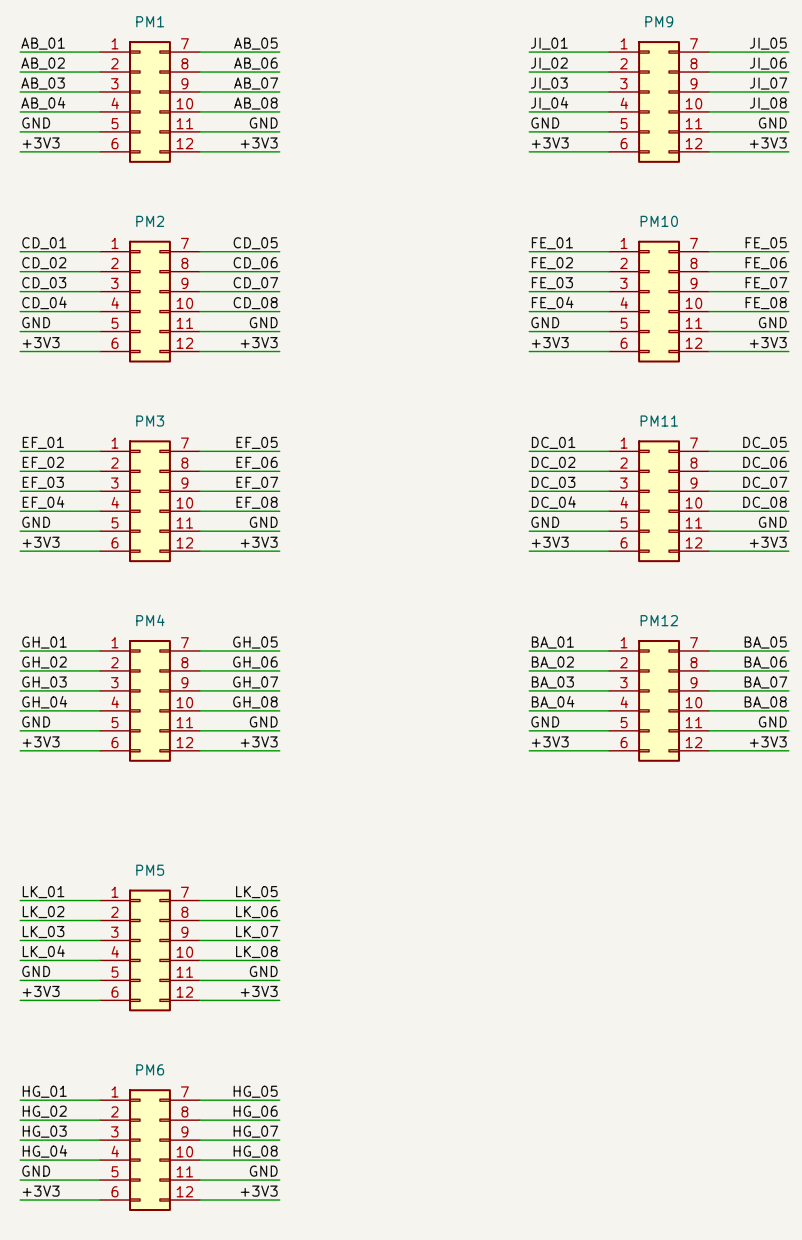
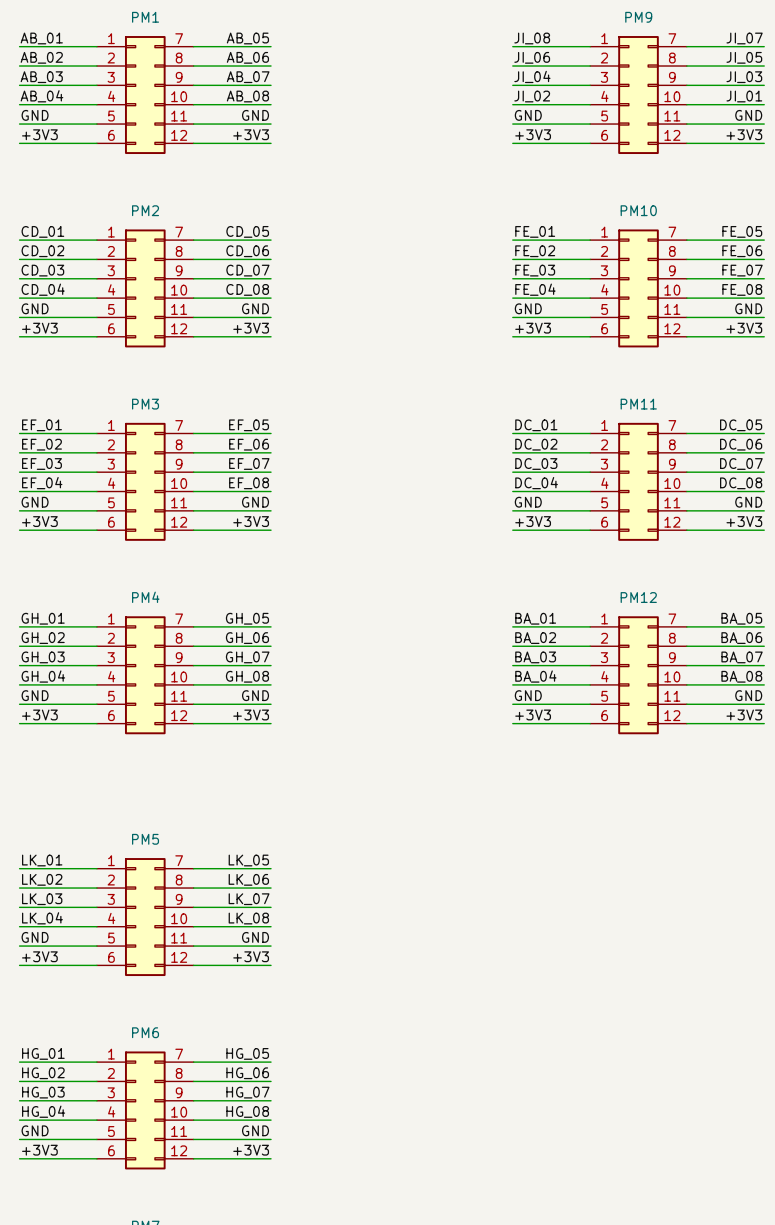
label: JI_01 (549, 43) -> JI_08 (532, 38)
label: JI_05 (768, 43) -> JI_07 (744, 38)
label: JI_02 (549, 63) -> JI_06 (532, 57)
label: JI_06 (768, 63) -> JI_05 (744, 57)
label: JI_03 (549, 83) -> JI_04 (532, 76)
label: JI_07 (768, 83) -> JI_03 (744, 77)
label: JI_04 (549, 103) -> JI_02 (532, 96)
label: JI_08 (768, 103) -> JI_01 (744, 96)

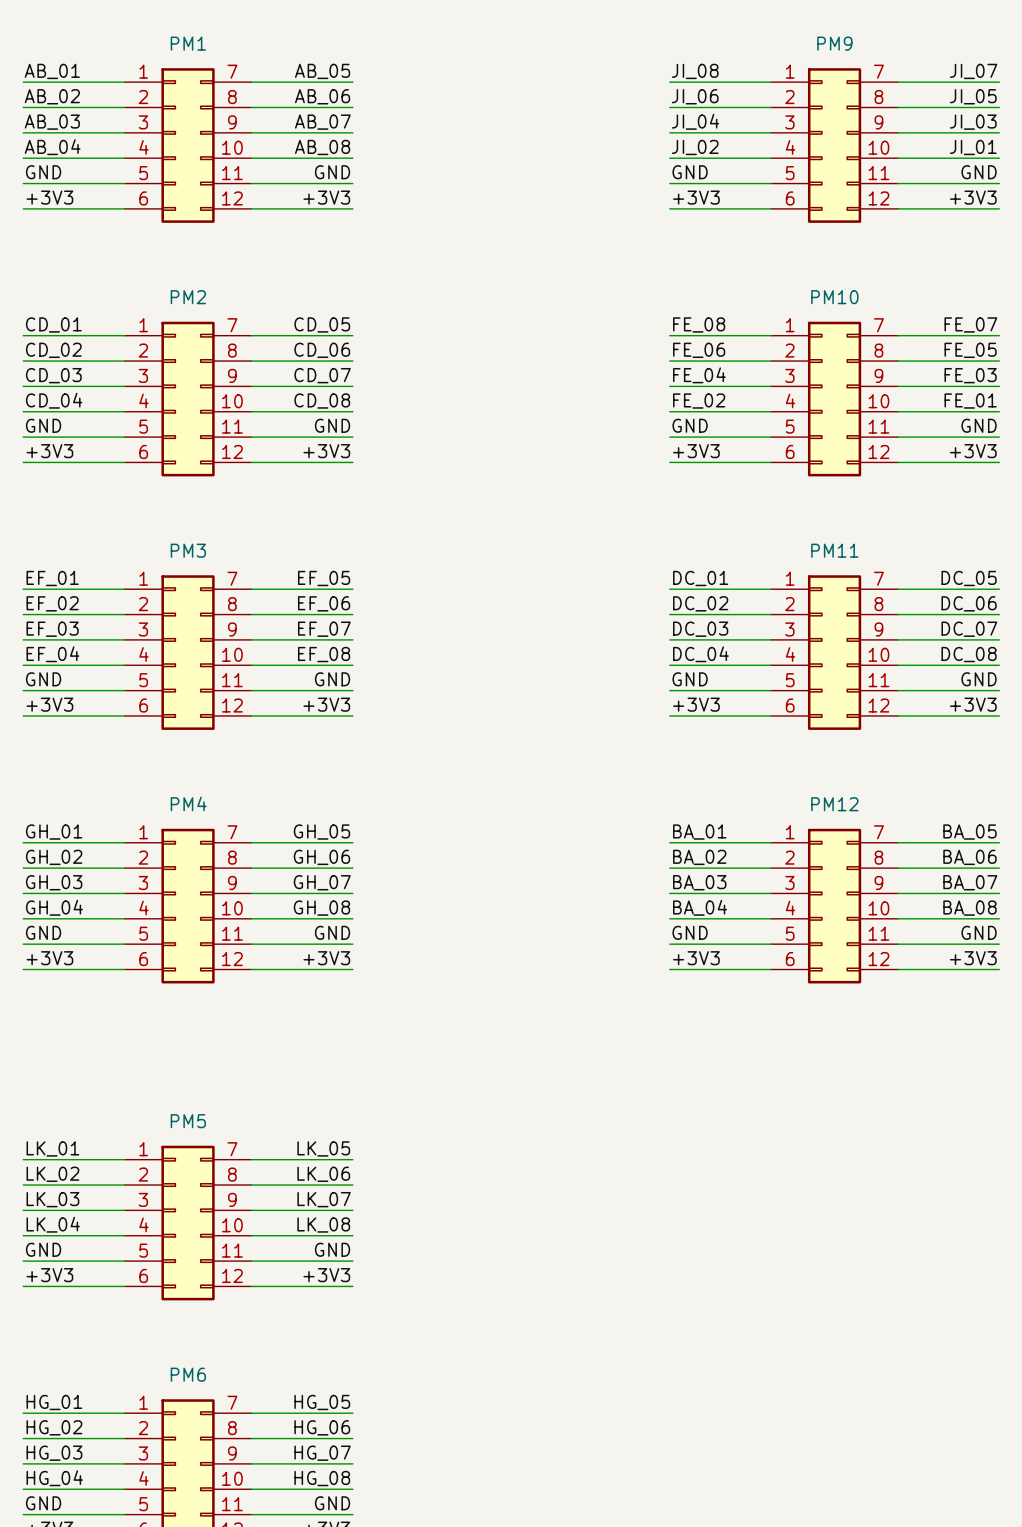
label: FE_01 (535, 231) -> FE_08 (699, 324)
label: FE_05 (742, 231) -> FE_07 (970, 324)
label: FE_02 (535, 251) -> FE_06 (699, 350)
label: FE_06 (742, 251) -> FE_05 (970, 350)
label: FE_03 (535, 270) -> FE_04 (699, 375)
label: FE_07 (742, 270) -> FE_03 (970, 375)
label: FE_04 (535, 289) -> FE_02 (699, 401)
label: FE_08 (742, 289) -> FE_01 (970, 401)

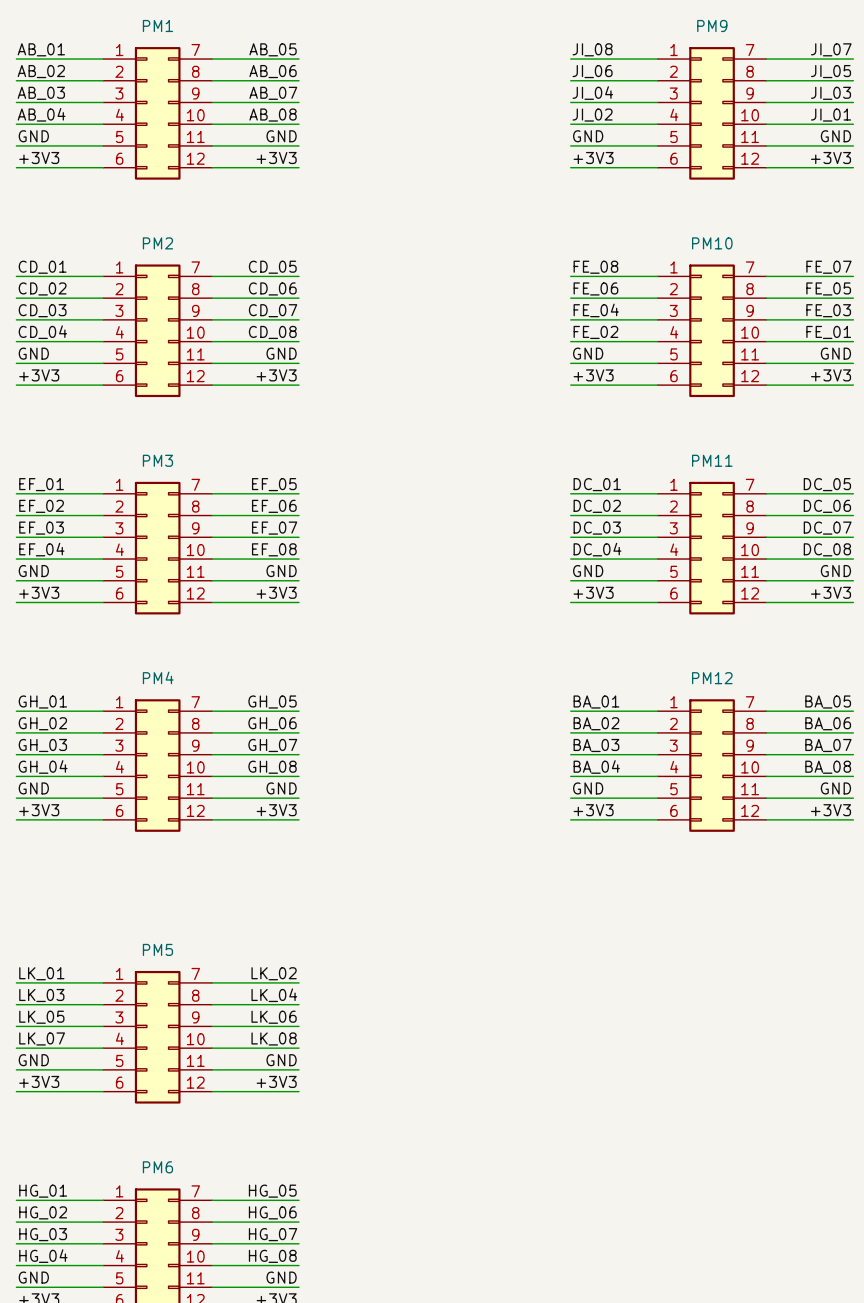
label: LK_05 (323, 1148) -> LK_02 (274, 973)
label: LK_02 (52, 1174) -> LK_03 (41, 995)
label: LK_06 (323, 1174) -> LK_04 (274, 995)
label: LK_03 (52, 1199) -> LK_05 (41, 1017)
label: LK_07 (324, 1199) -> LK_06 (274, 1017)
label: LK_04 (53, 1224) -> LK_07 (42, 1038)

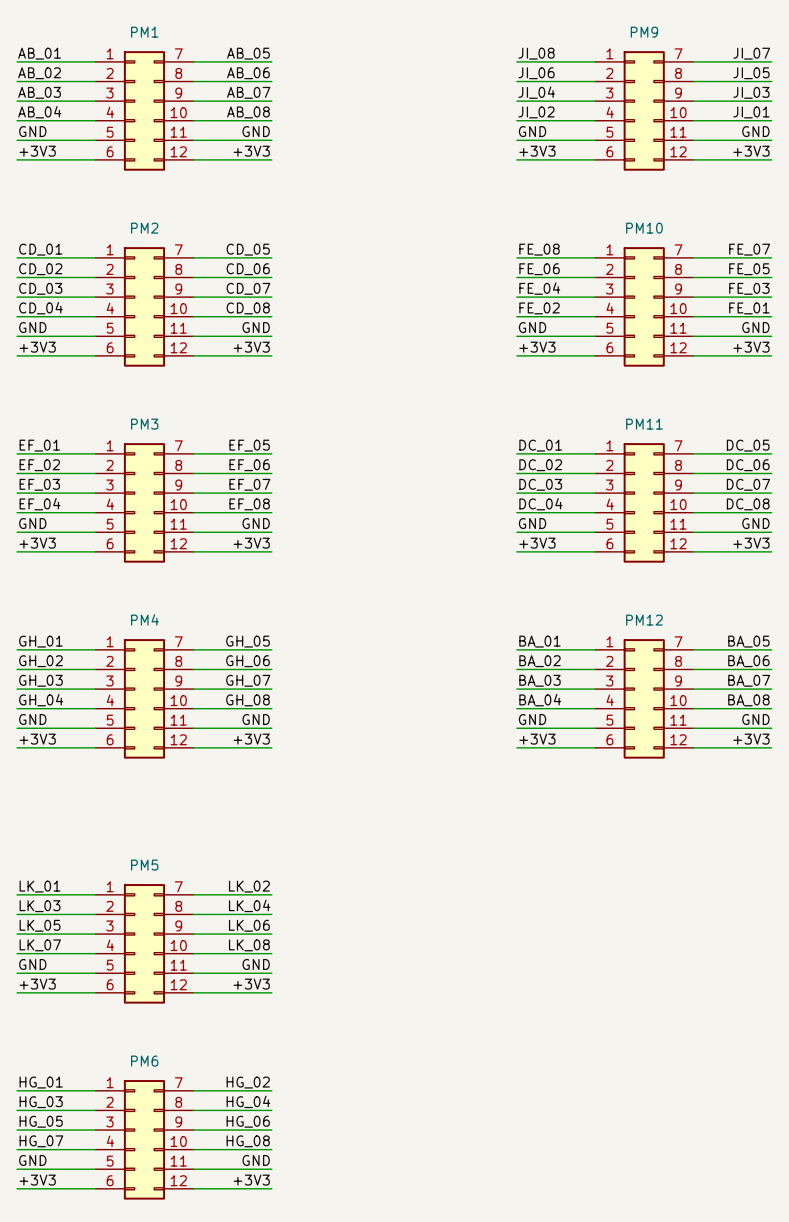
label: HG_05 (272, 1191) -> HG_02 (248, 1082)
label: HG_02 (43, 1212) -> HG_03 (41, 1102)
label: HG_06 (272, 1212) -> HG_04 (248, 1101)
label: HG_03 (43, 1234) -> HG_05 (41, 1121)
label: HG_07 (273, 1234) -> HG_06 (248, 1121)
label: HG_04 (43, 1256) -> HG_07 (41, 1141)

